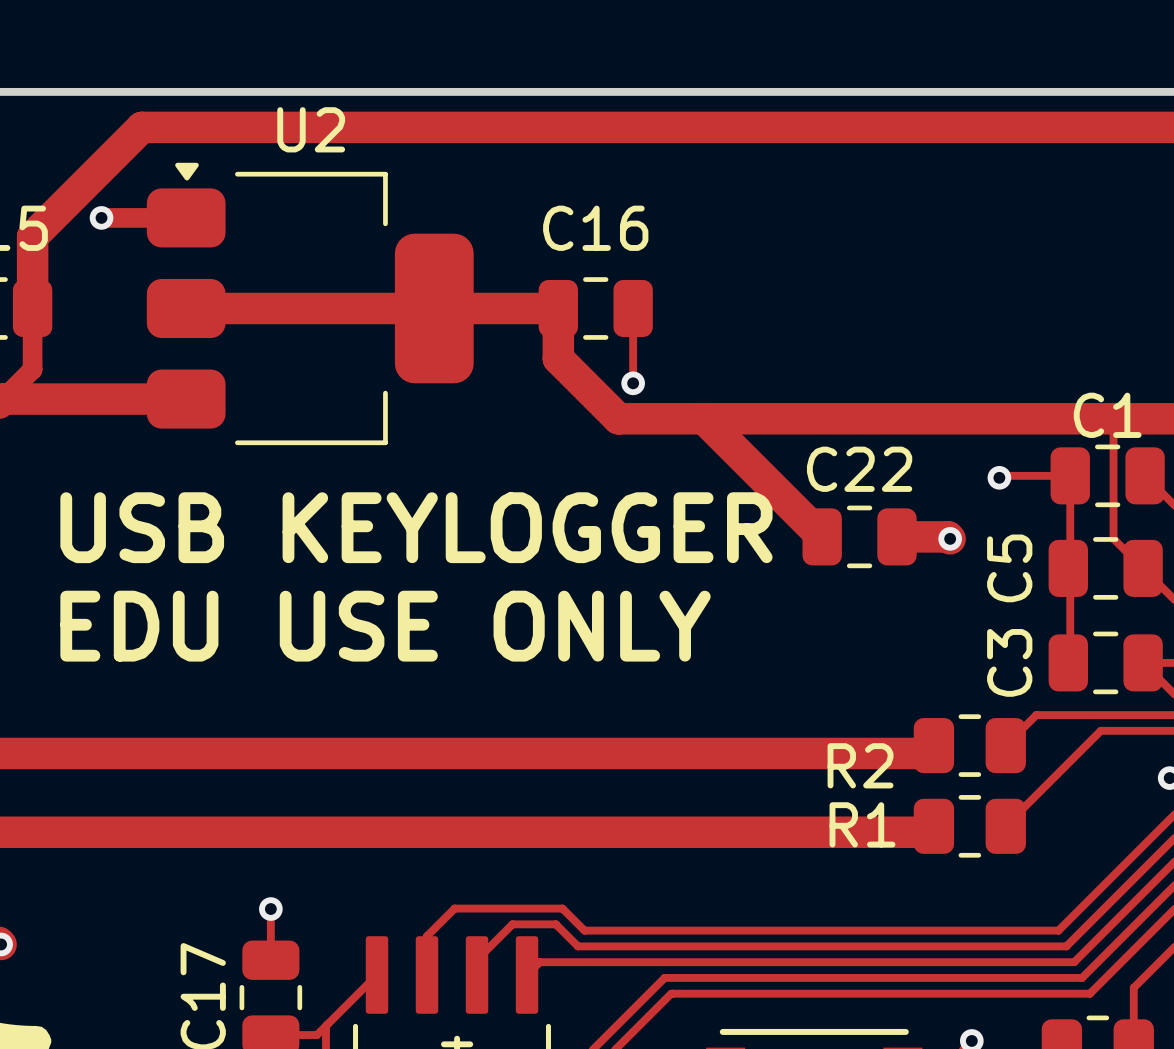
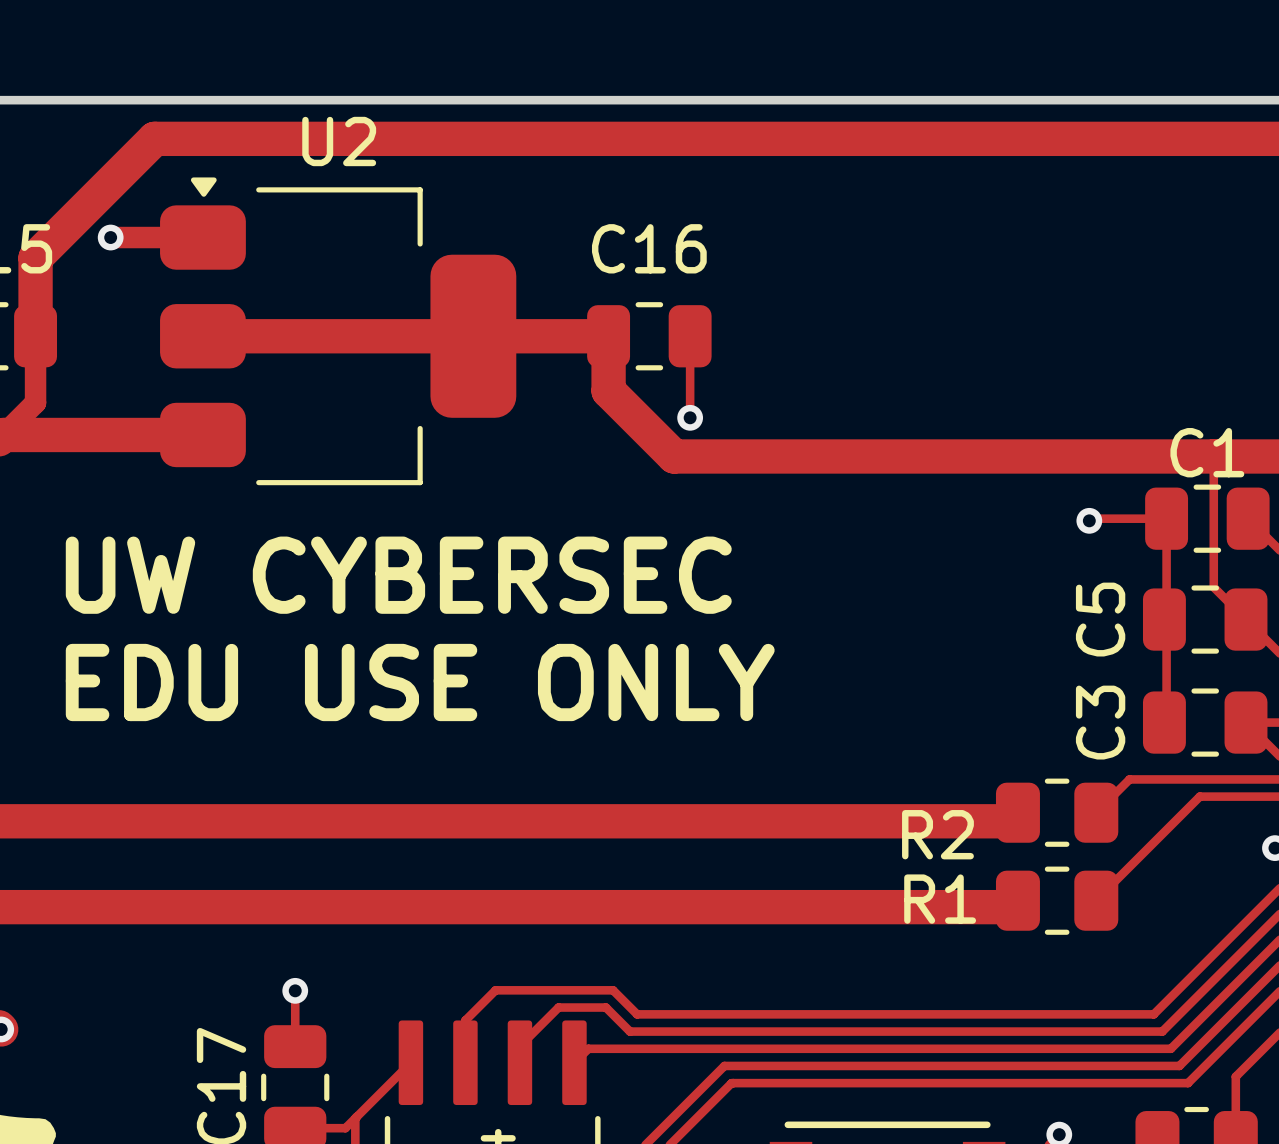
top track: (704, 418) (822, 536) -> none
text: USB KEYLOGGER (416, 527) -> UW CYBERSEC (398, 575)
C22: (859, 536) -> none
top track: (896, 536) (948, 536) (950, 538) -> none
via: (950, 538) -> none

